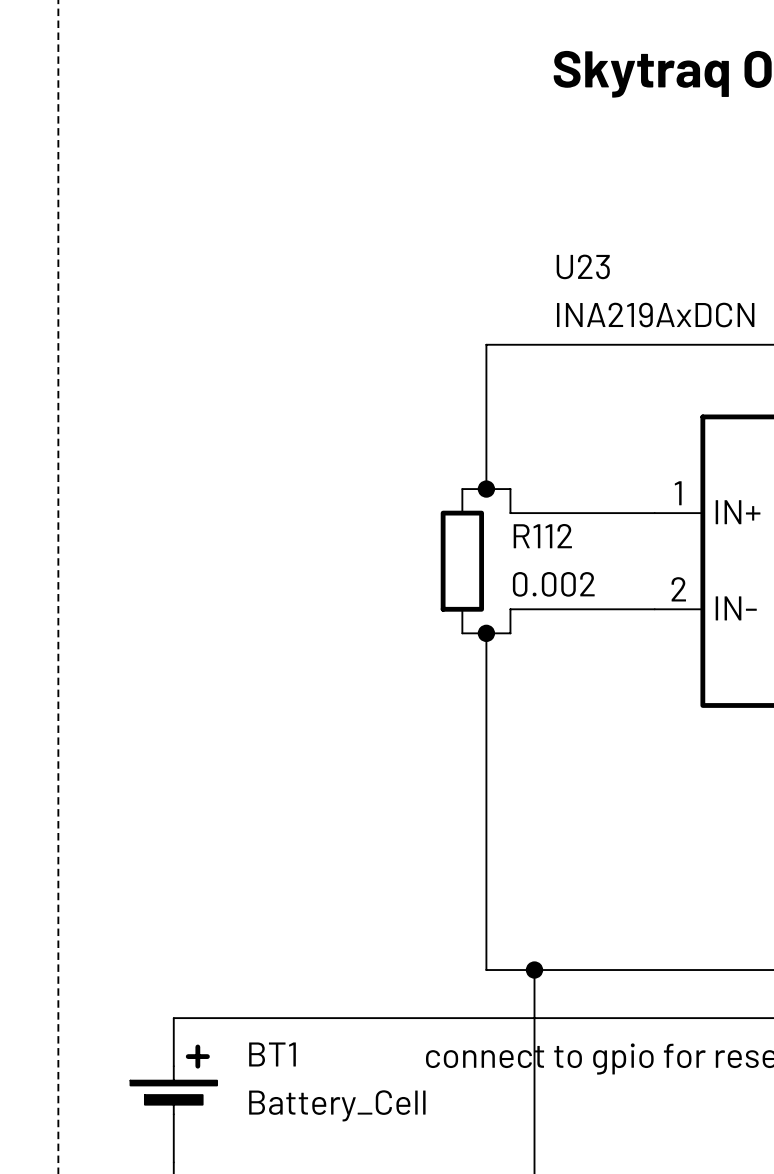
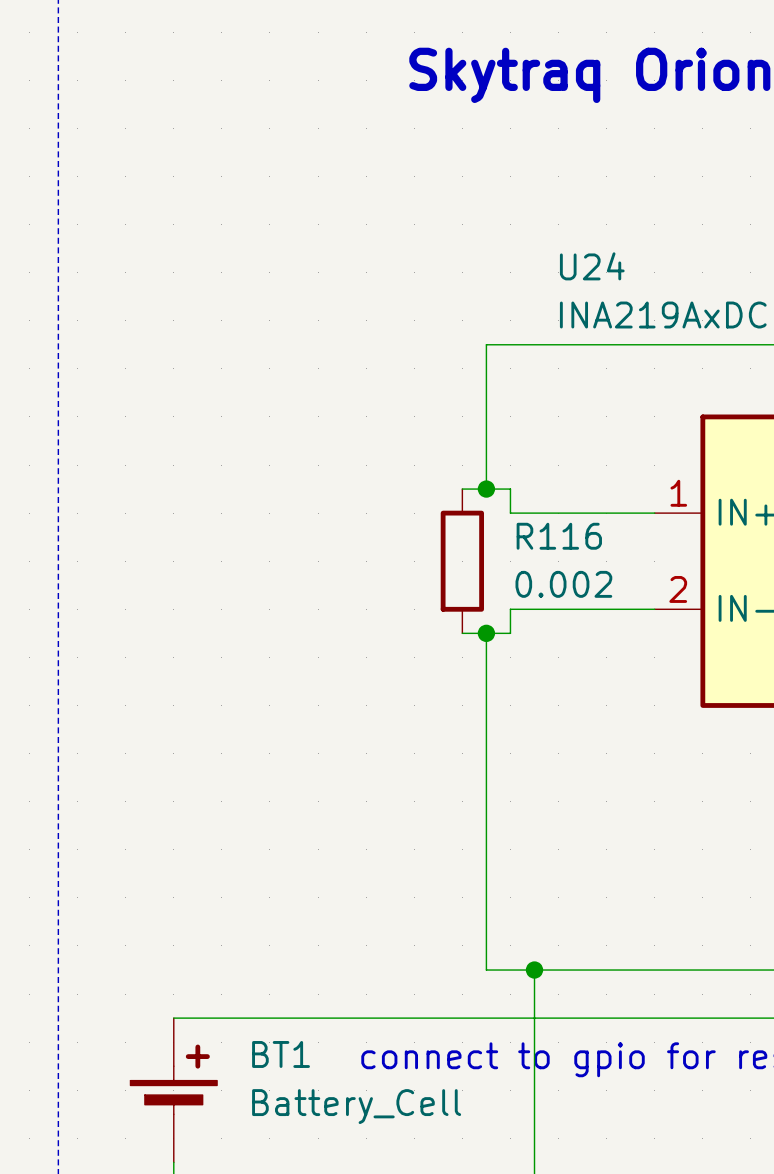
U23 name: U23 (583, 266) -> U24 (592, 266)
R112 name: R112 (542, 536) -> R116 (559, 536)

